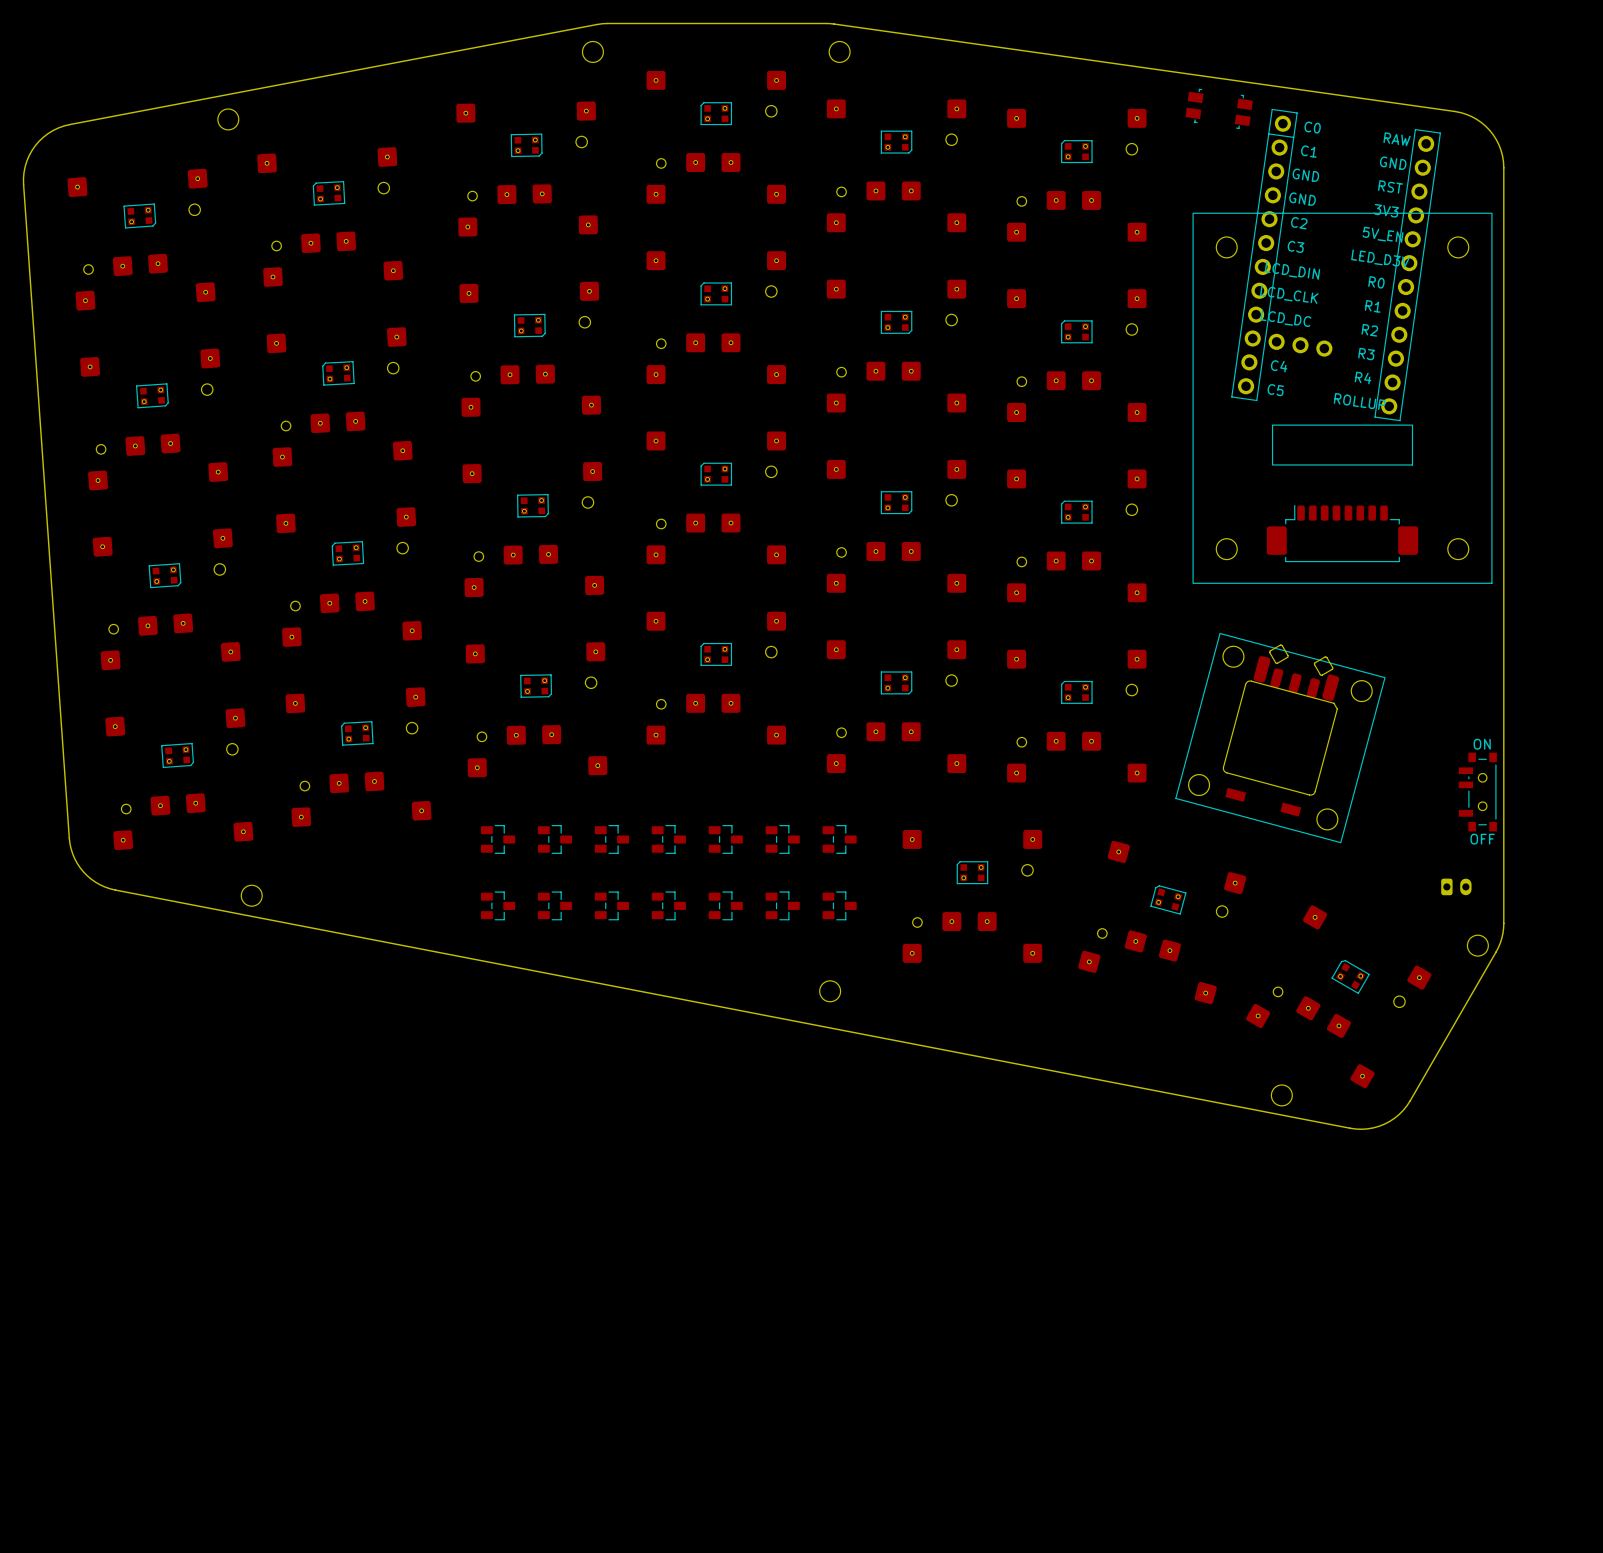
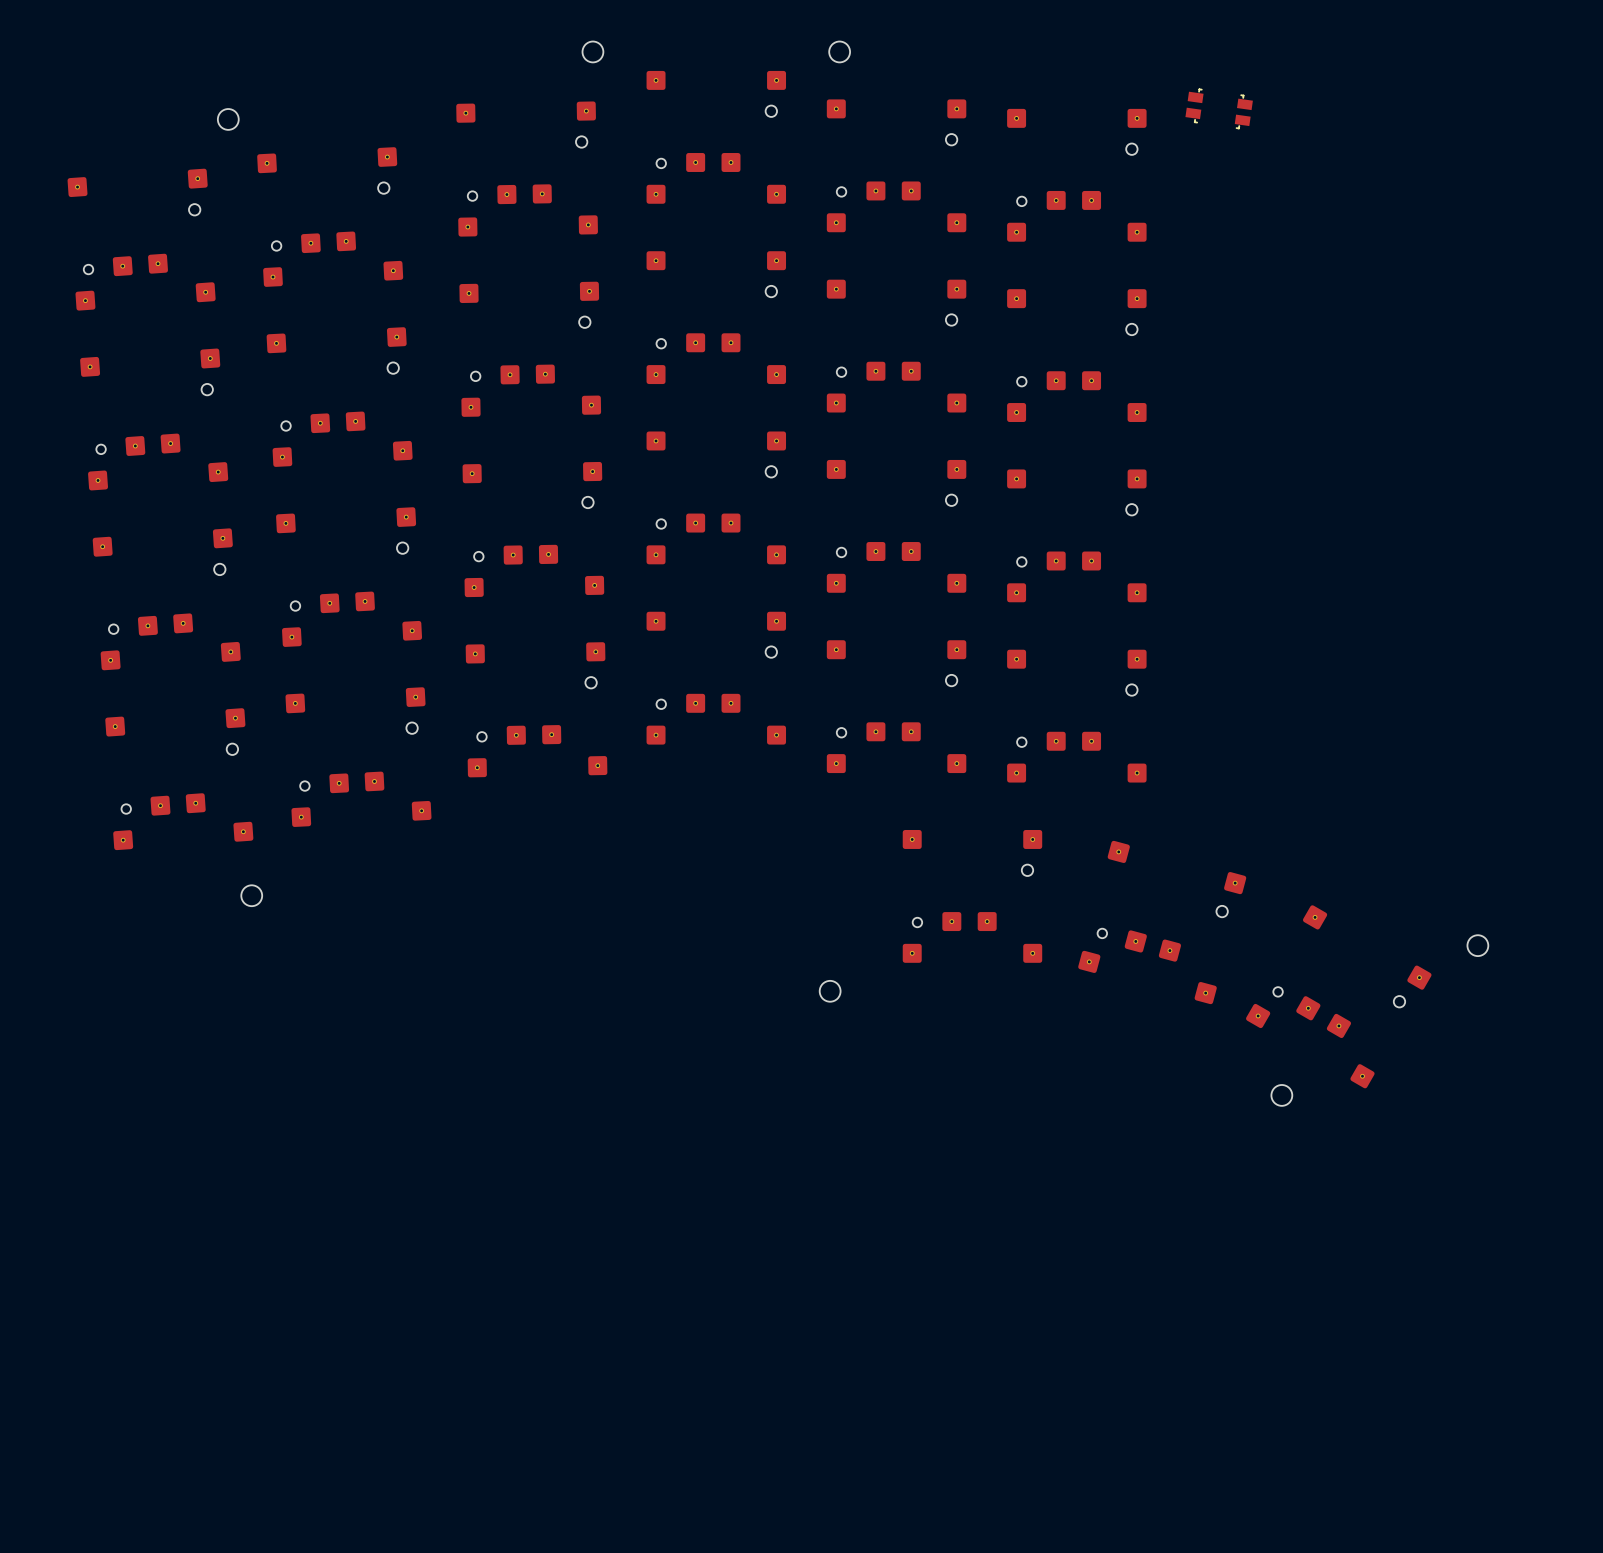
board edge: (607, 23) (834, 24) (1454, 111) (1476, 119) (1493, 135) (1501, 150) (1503, 167) (1503, 928) (1496, 951) (1410, 1100) (1394, 1118) (1373, 1127) (1350, 1128) (115, 890) (95, 882) (80, 867) (72, 853) (69, 838) (23, 184) (25, 166) (31, 150) (48, 133) (69, 124) (607, 23) -> none
part: (716, 113) -> none
part: (896, 142) -> none
part: (526, 145) -> none
part: (1076, 151) -> none
part: (329, 193) -> none
part: (139, 215) -> none
part: (1336, 265) -> none
part: (716, 293) -> none
part: (896, 322) -> none
part: (529, 325) -> none
part: (1076, 331) -> none
part: (338, 373) -> none
part: (152, 395) -> none
part: (1342, 398) -> none
part: (716, 474) -> none
part: (896, 502) -> none
part: (532, 505) -> none
part: (1076, 512) -> none
part: (1342, 533) -> none
part: (347, 553) -> none
part: (164, 575) -> none
part: (716, 654) -> none
part: (896, 682) -> none
part: (536, 686) -> none
part: (1076, 692) -> none
part: (357, 733) -> none
part: (1280, 738) -> none
part: (177, 755) -> none
part: (1477, 792) -> none
part: (498, 839) -> none
part: (554, 839) -> none
part: (611, 839) -> none
part: (668, 839) -> none
part: (725, 839) -> none
part: (782, 839) -> none
part: (839, 839) -> none
part: (972, 872) -> none
part: (1456, 886) -> none
part: (1168, 899) -> none
part: (498, 905) -> none
part: (554, 905) -> none
part: (611, 905) -> none
part: (668, 905) -> none
part: (725, 905) -> none
part: (782, 905) -> none
part: (839, 905) -> none
part: (1350, 976) -> none

